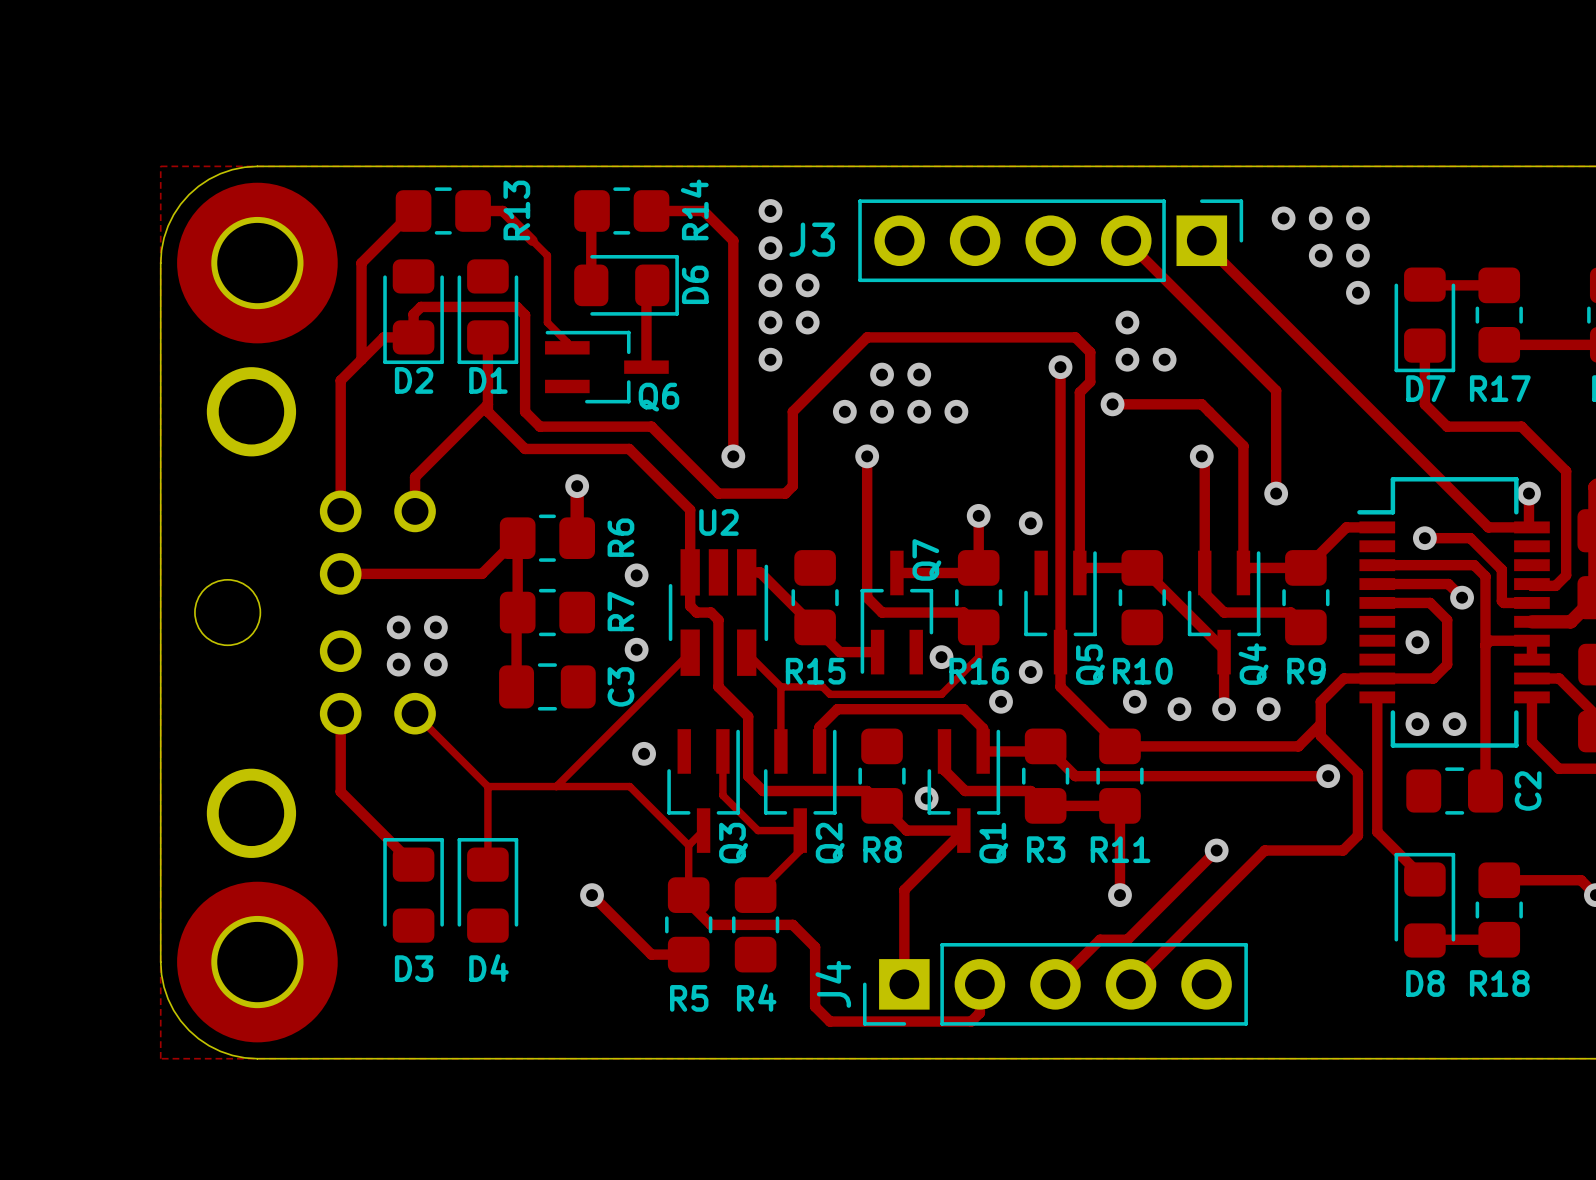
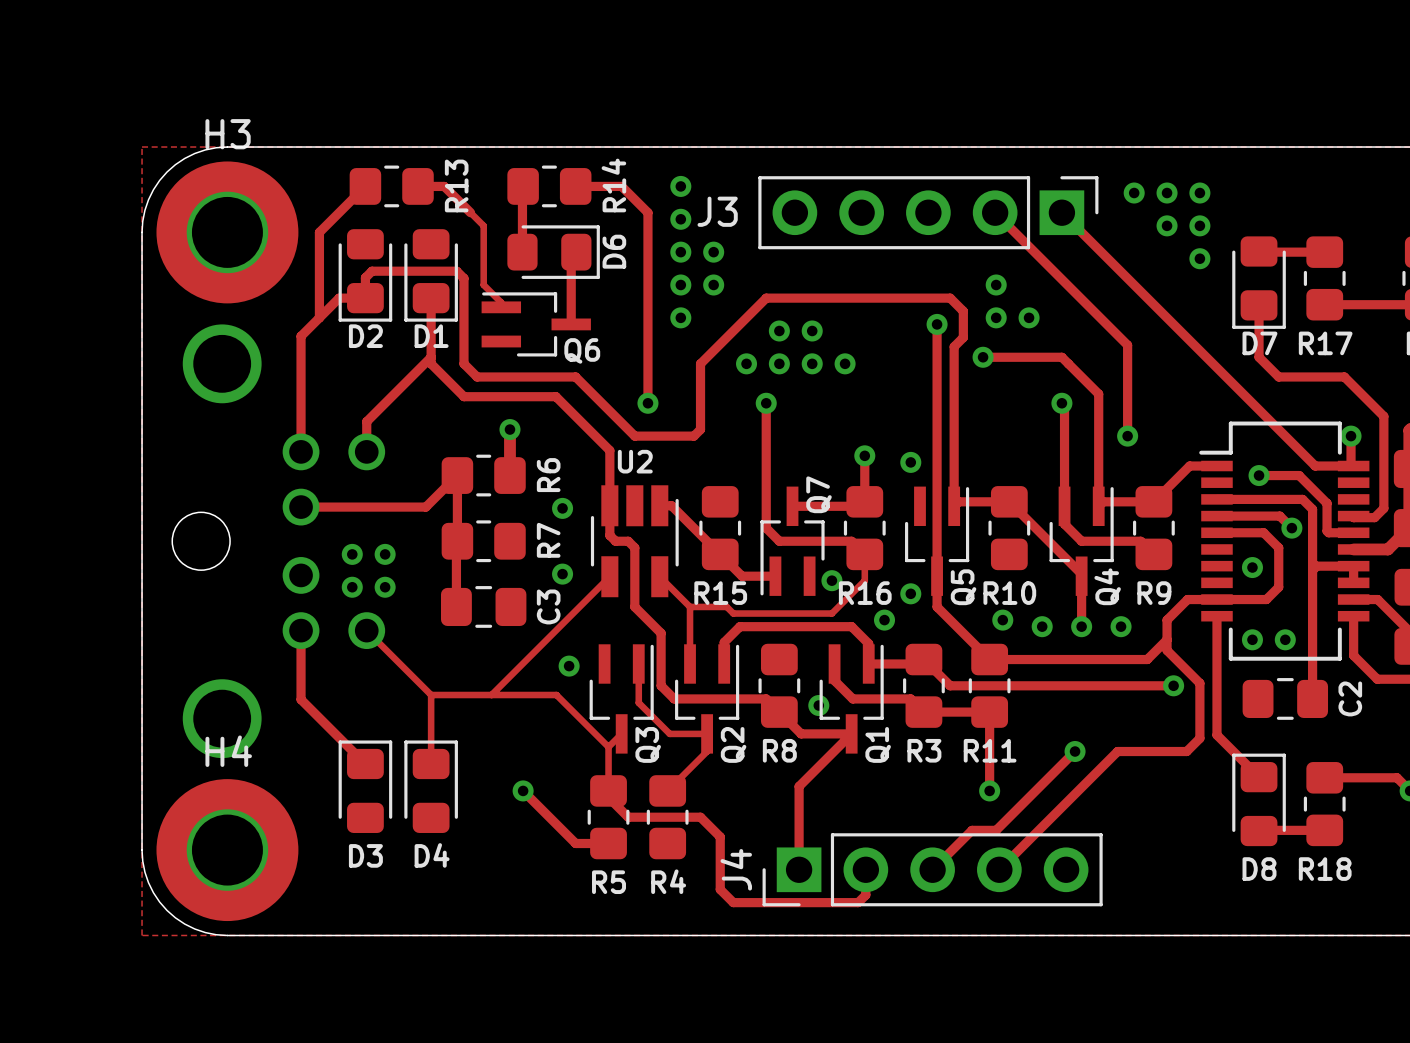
H3 name: none -> H3 (228, 134)
H4 name: none -> H4 (228, 751)

